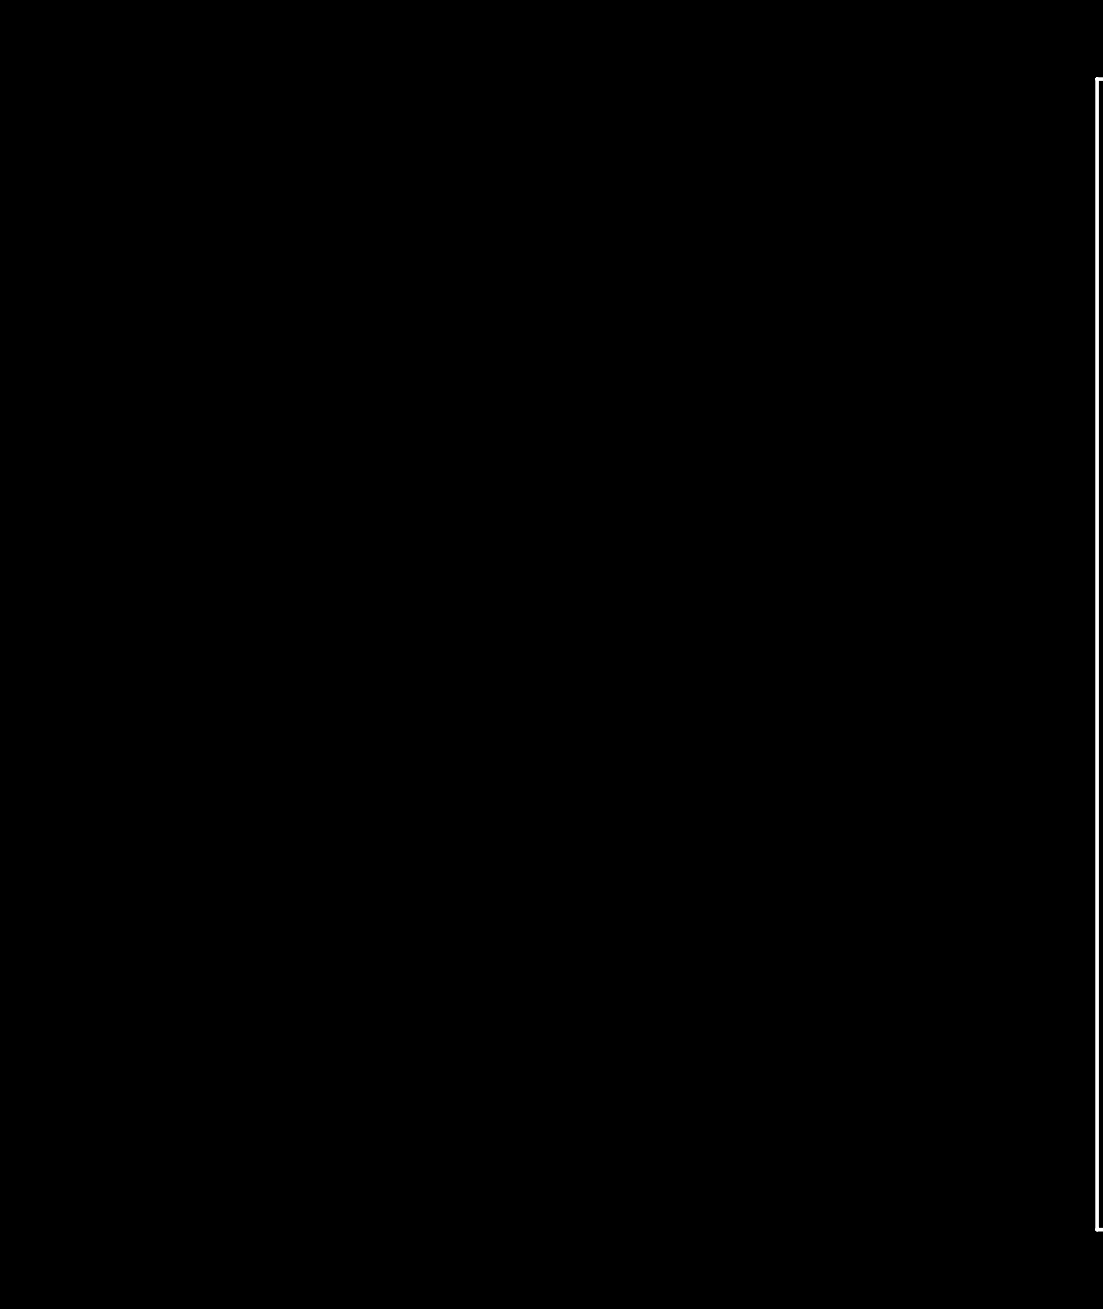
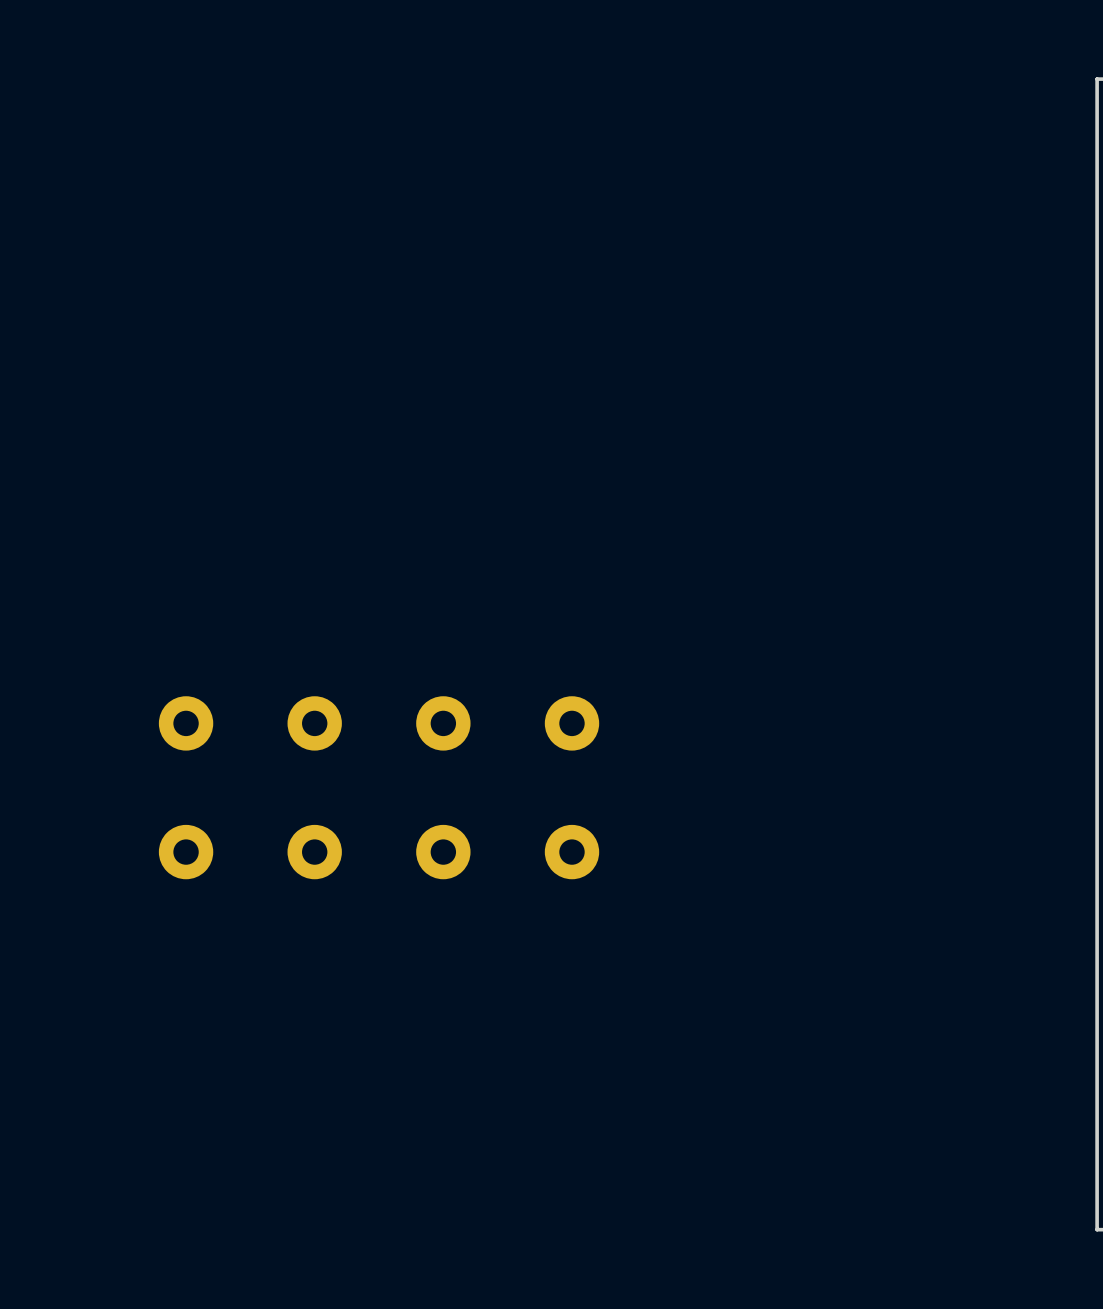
part: none -> (186, 723)
part: none -> (314, 723)
part: none -> (443, 723)
part: none -> (572, 723)
part: none -> (186, 852)
part: none -> (314, 852)
part: none -> (443, 852)
part: none -> (572, 852)

